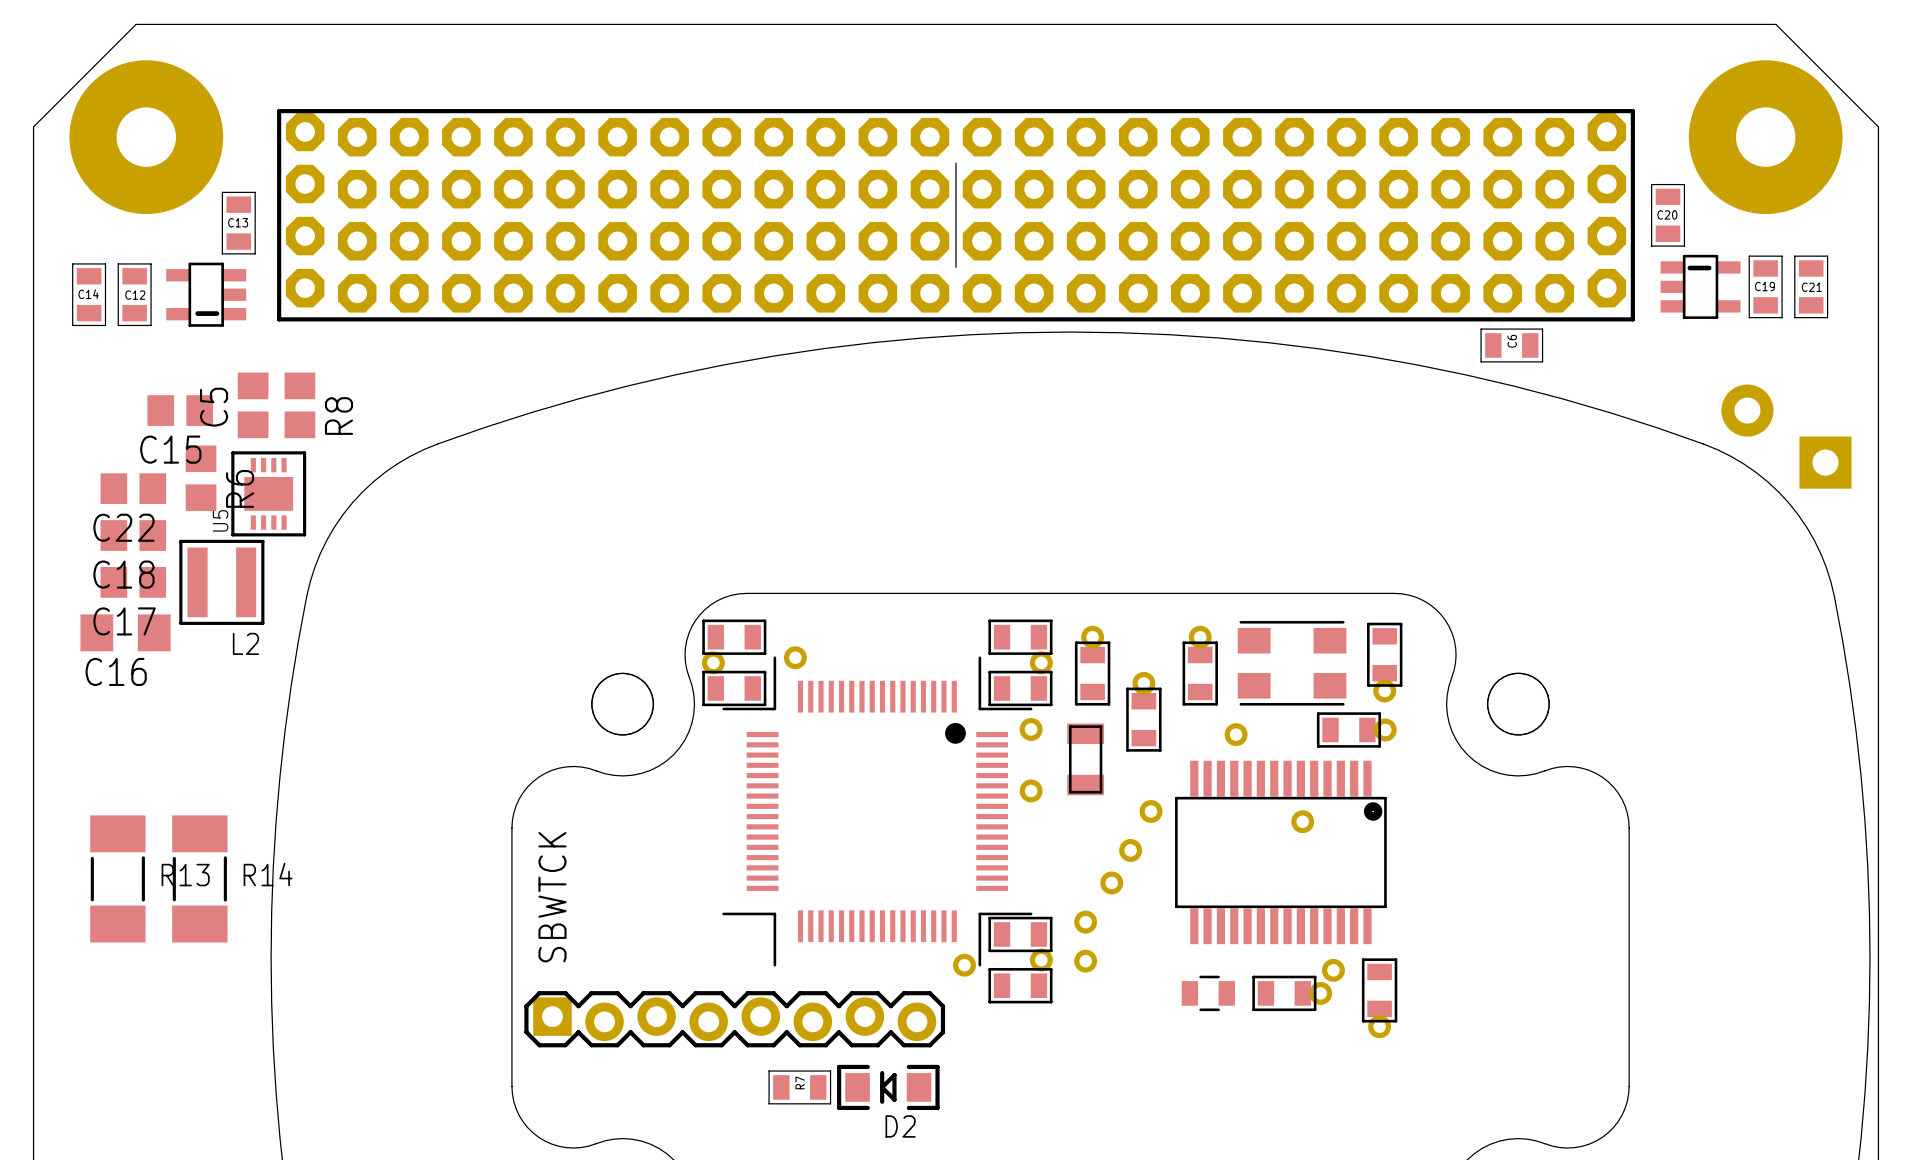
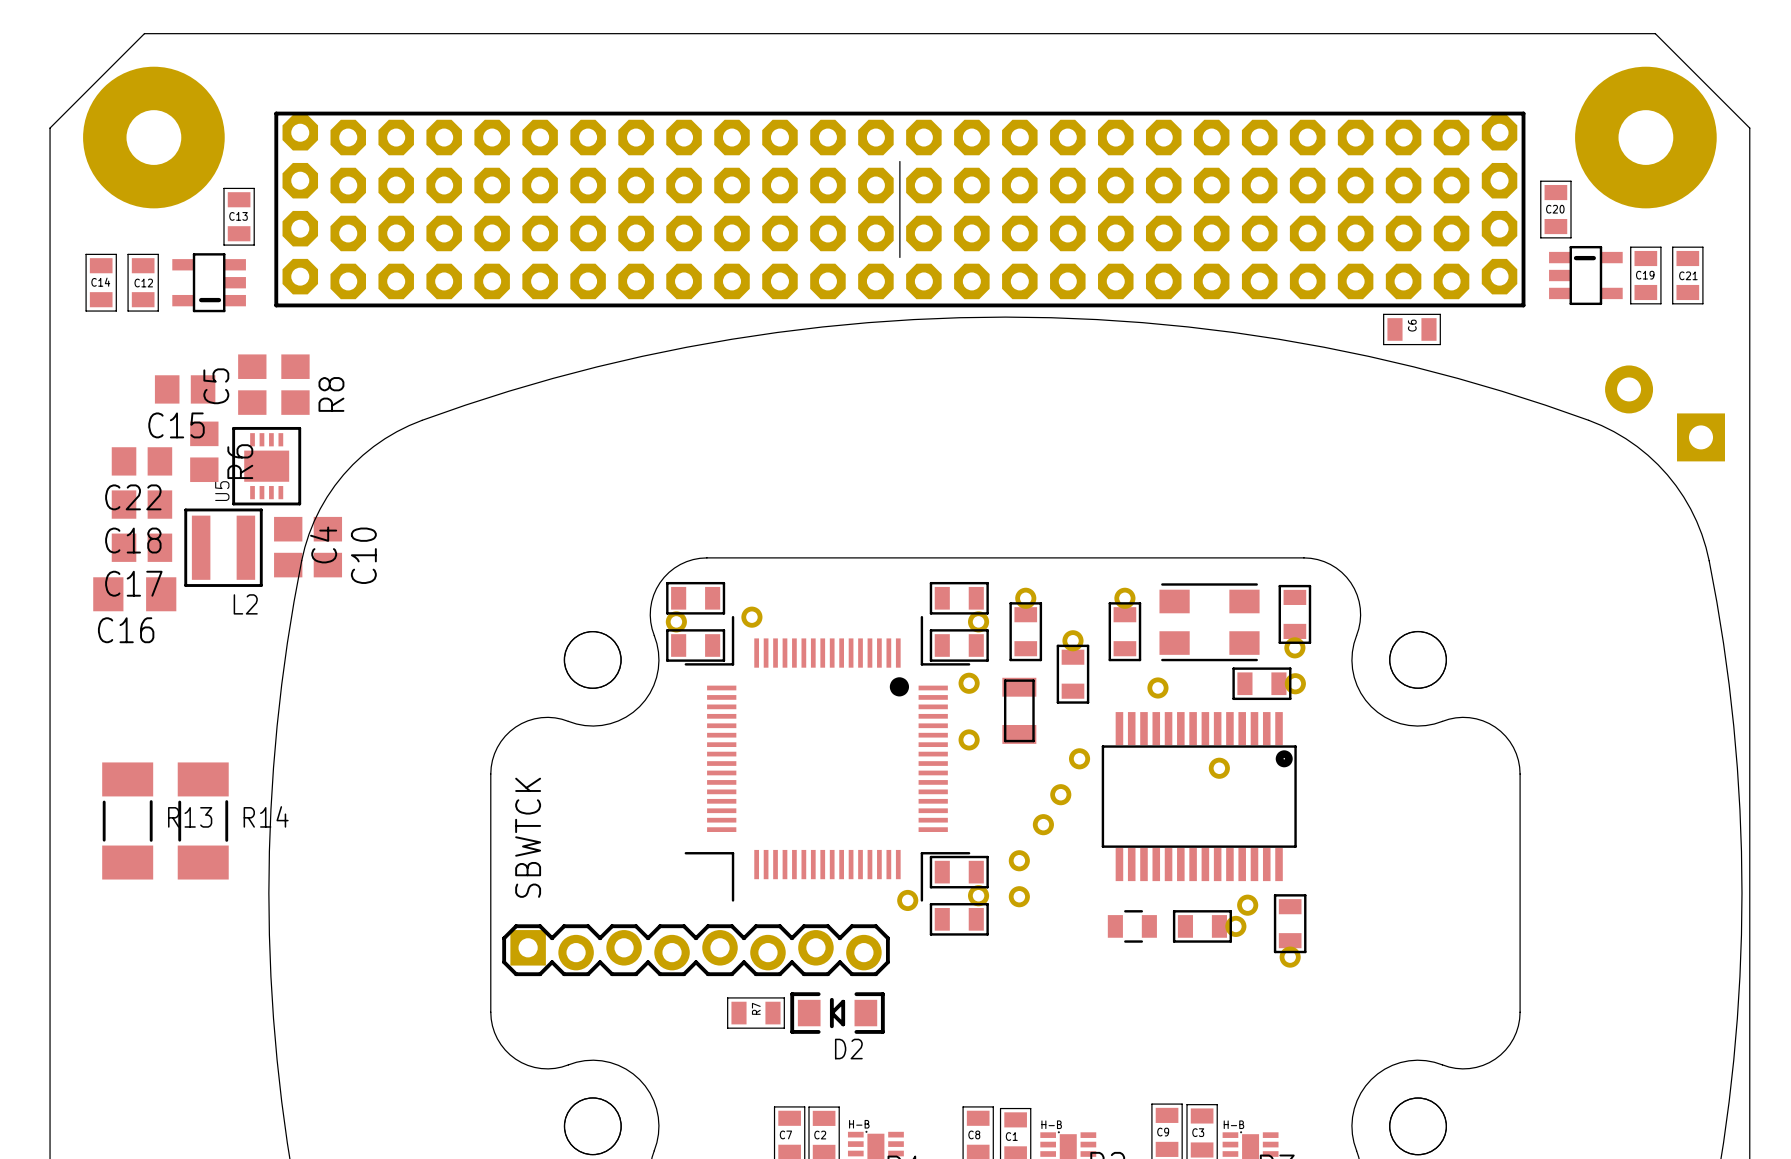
C4: none -> (288, 547)
C10: none -> (327, 547)

